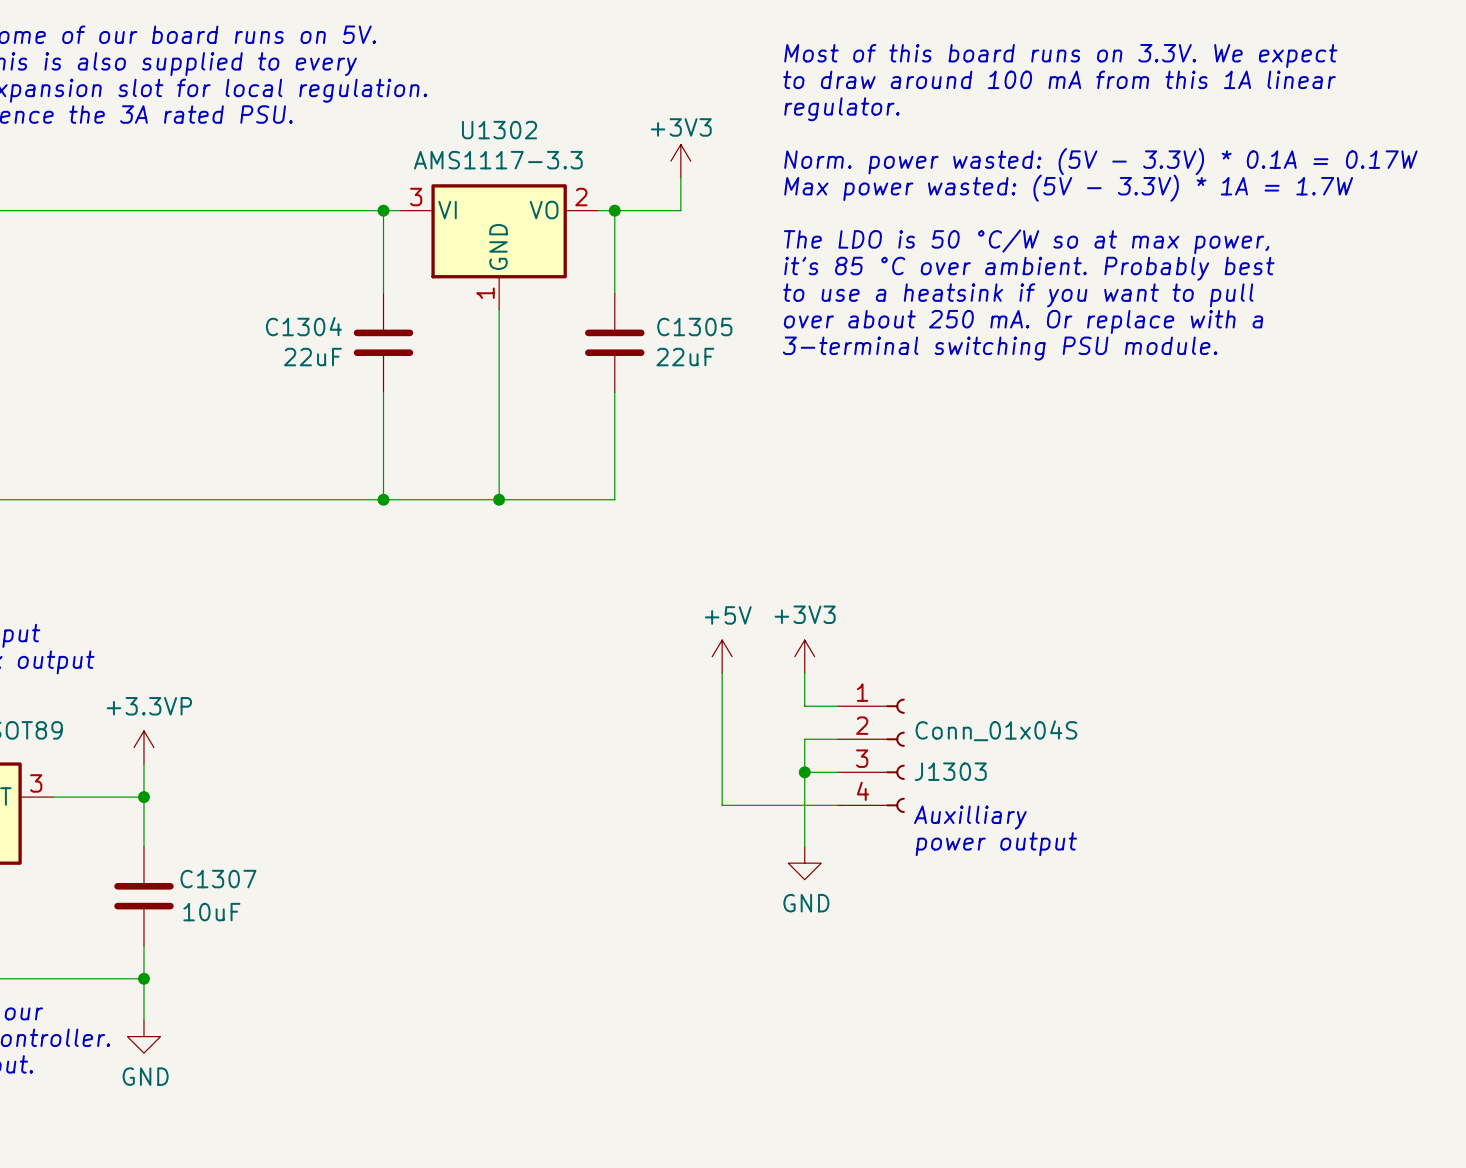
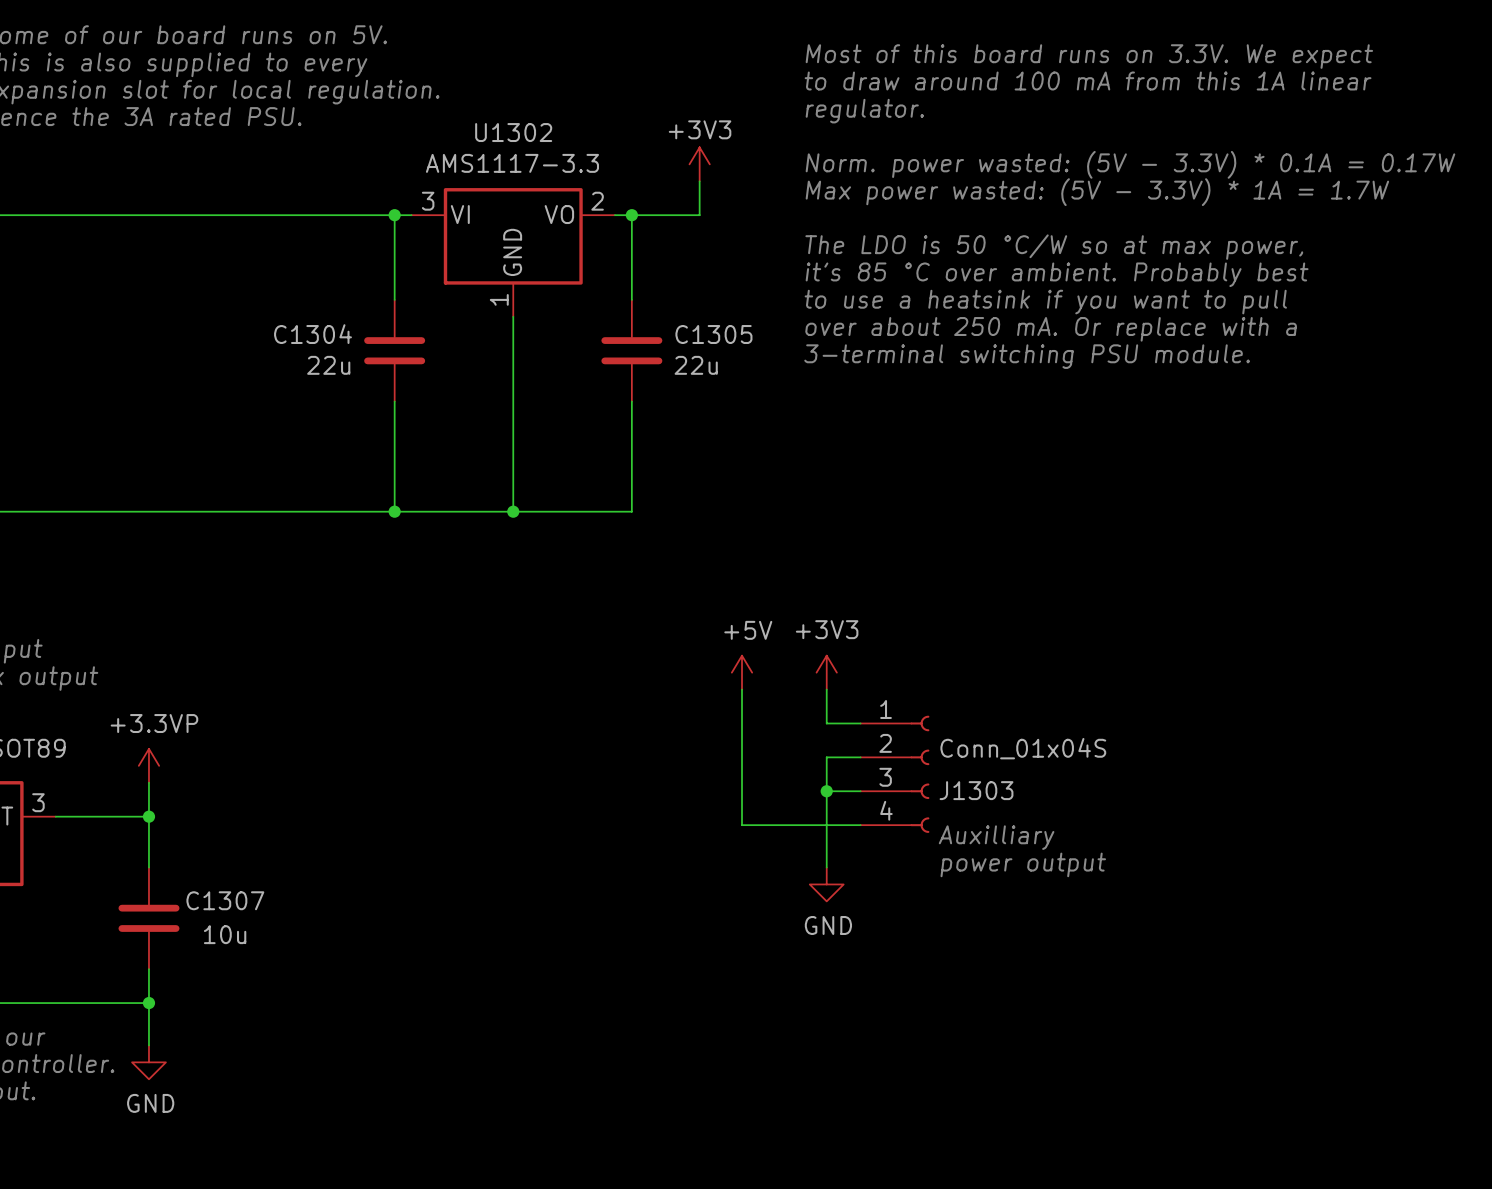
C1304 value: 22uF (312, 357) -> 22u (328, 365)
C1305 value: 22uF (685, 357) -> 22u (696, 365)
C1307 value: 10uF (211, 912) -> 10u (225, 934)

